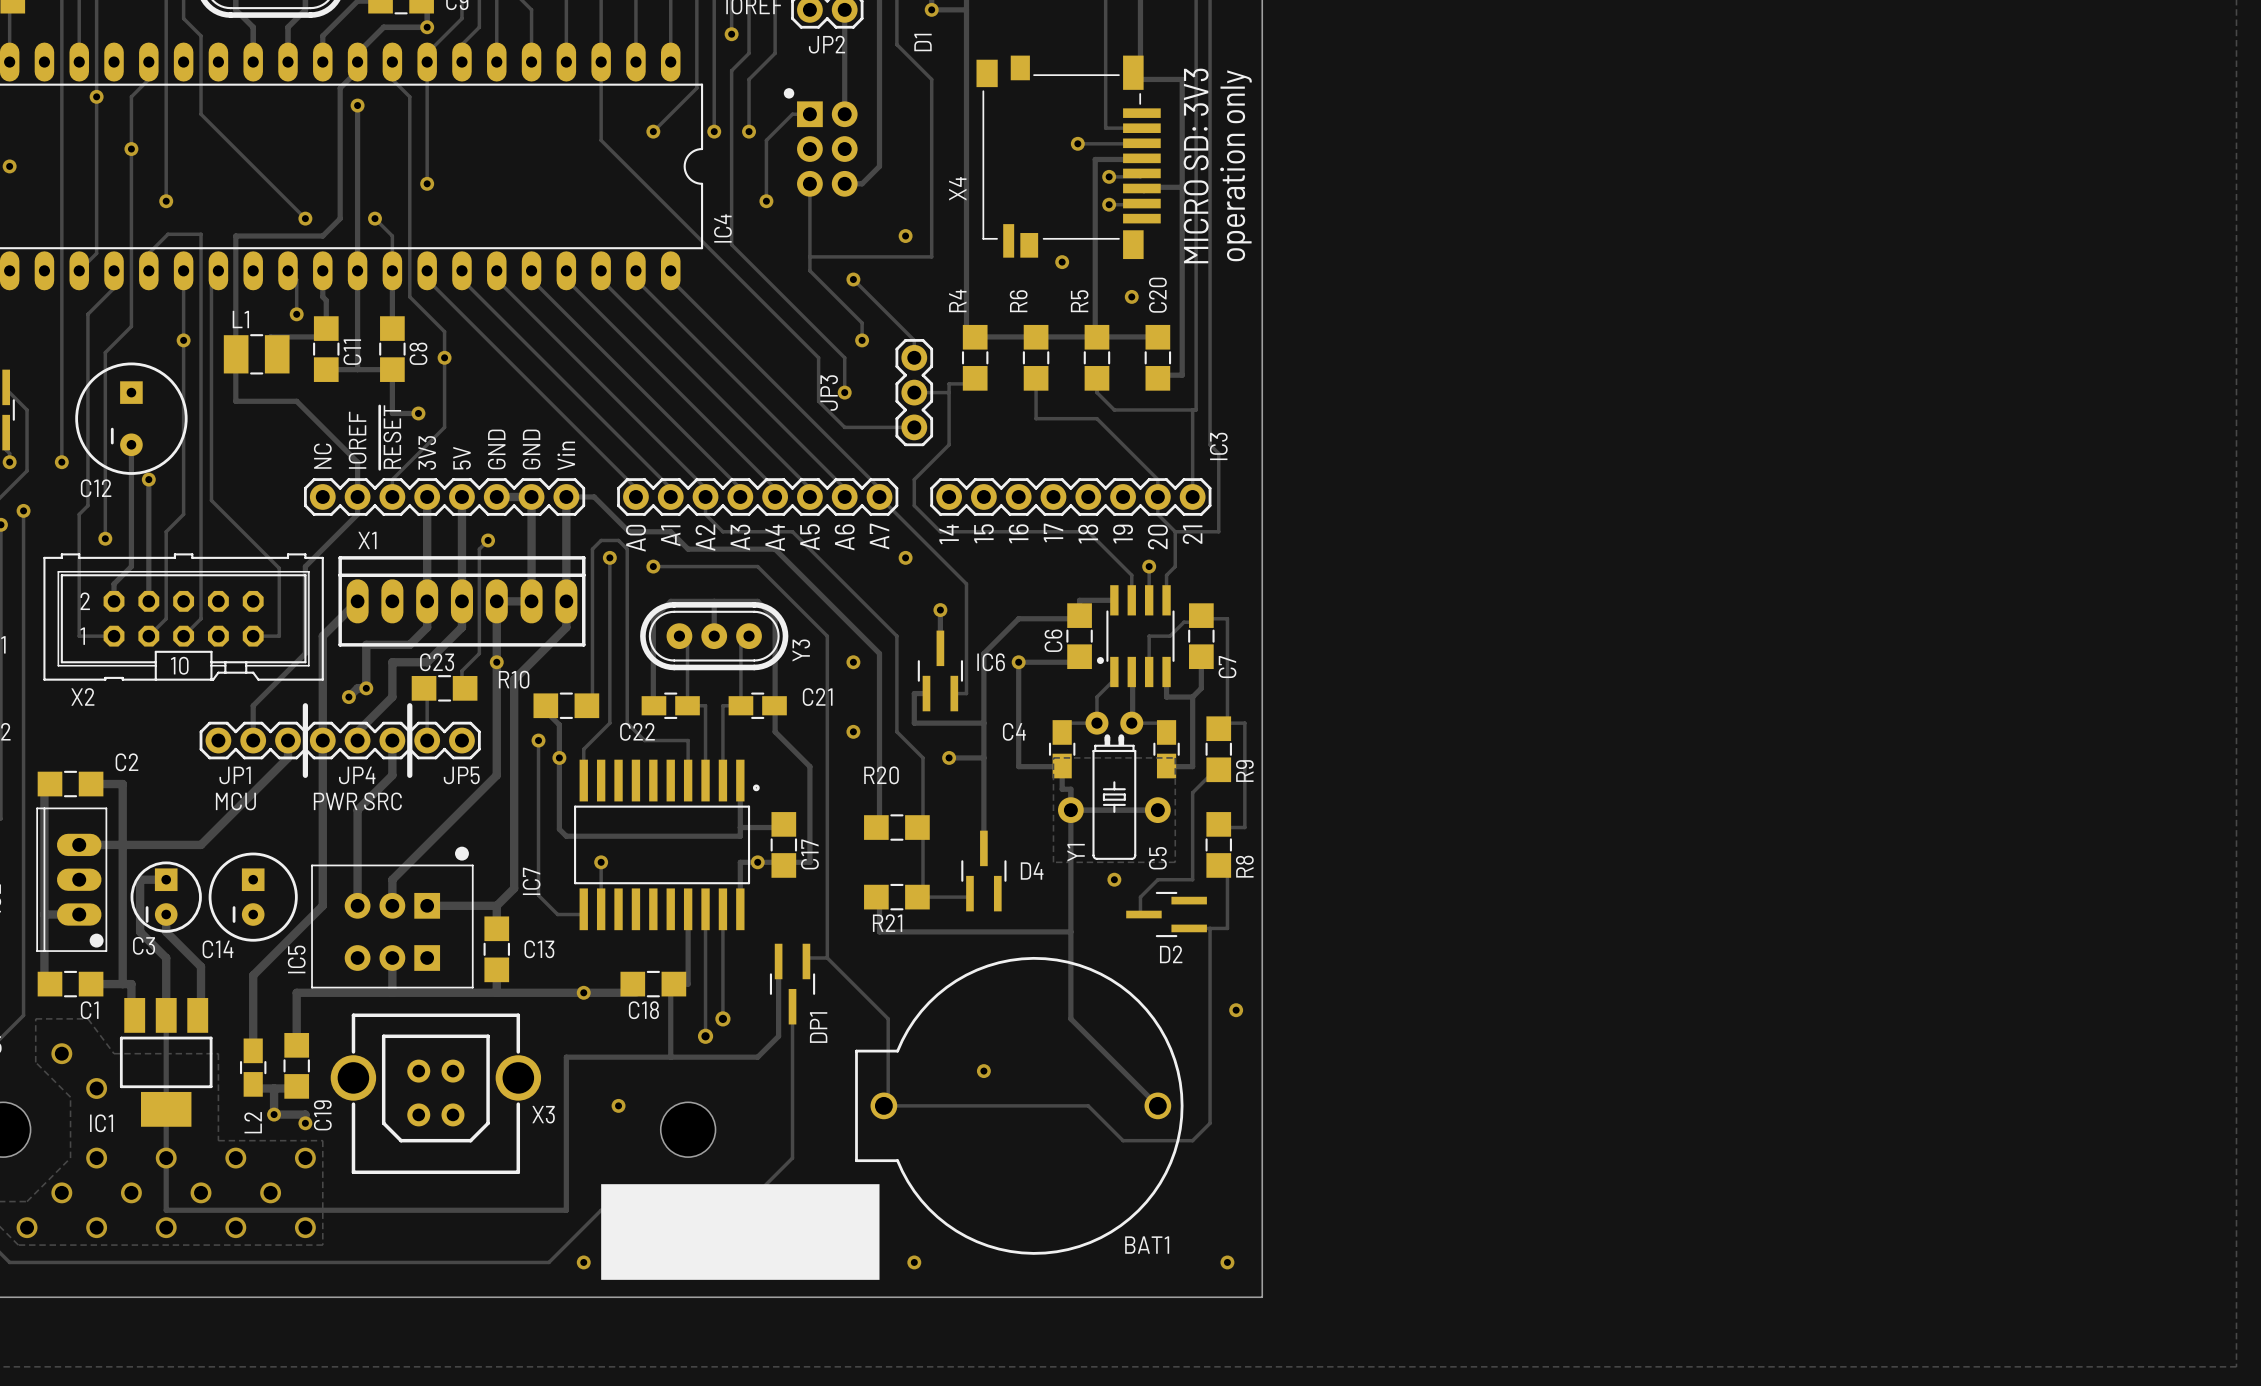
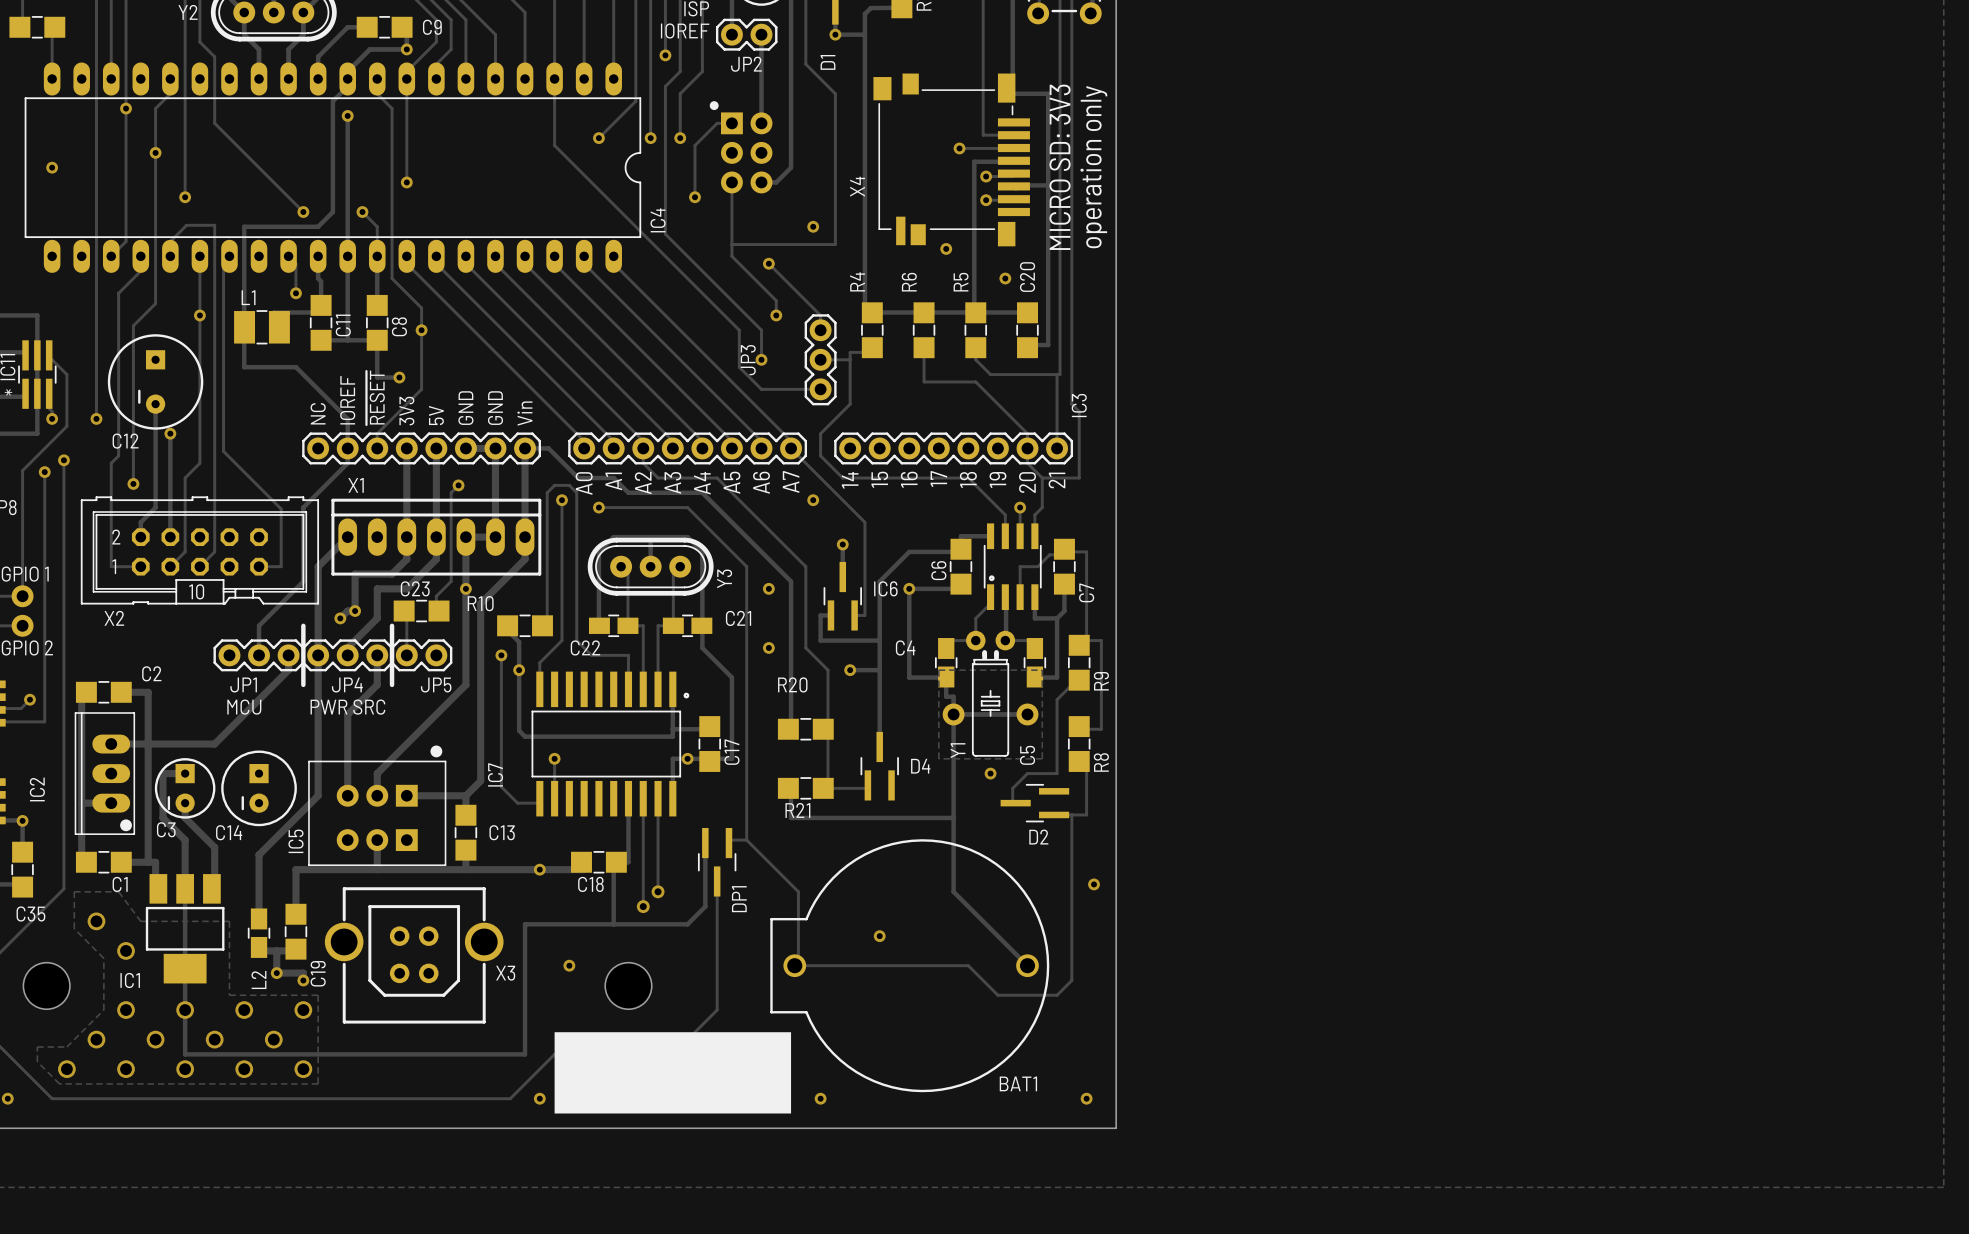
IC3 footprint: [1096, 585, 1175, 688] -> [983, 523, 1042, 610]

